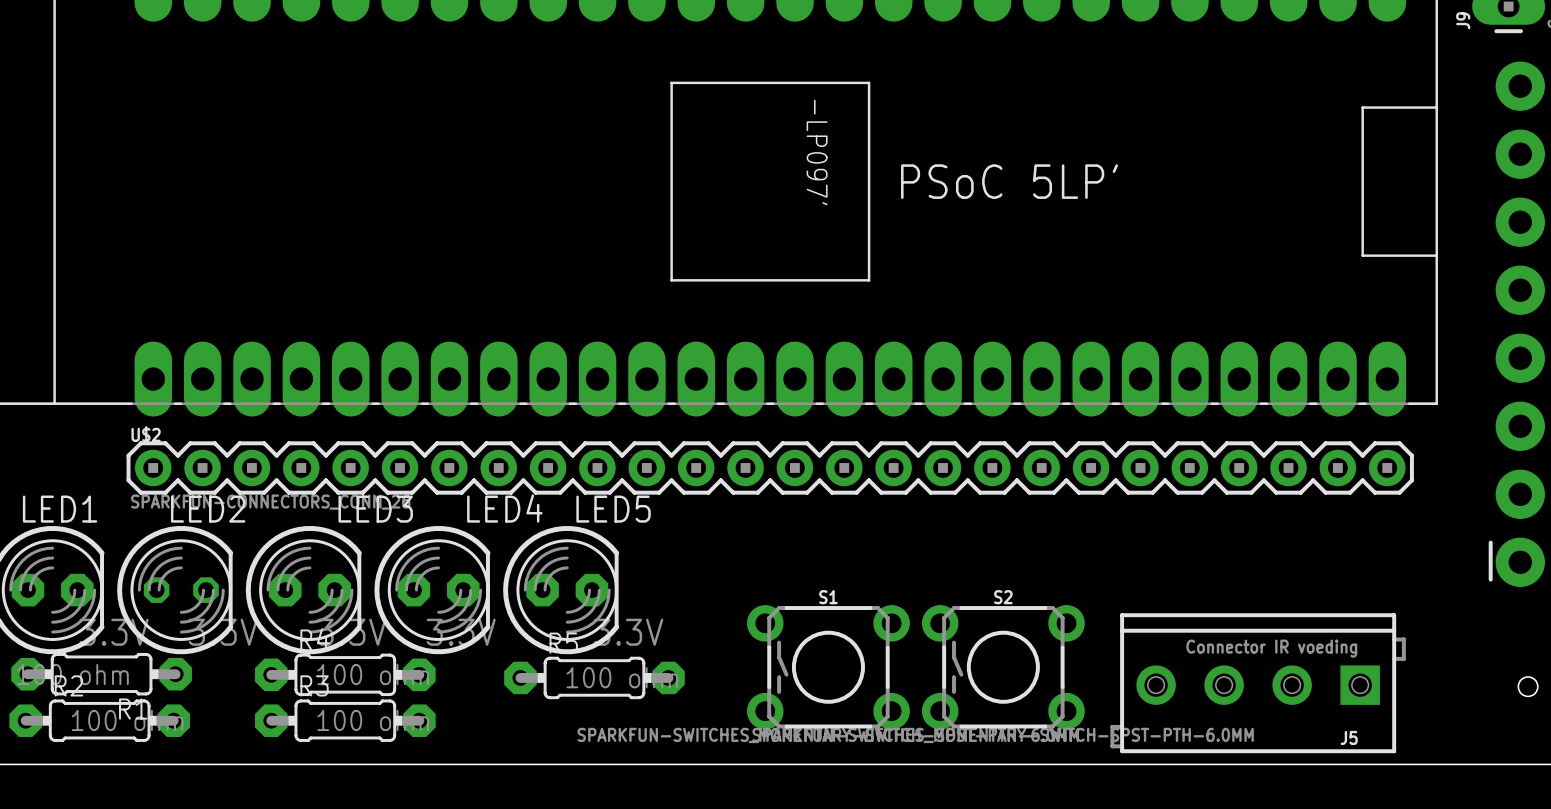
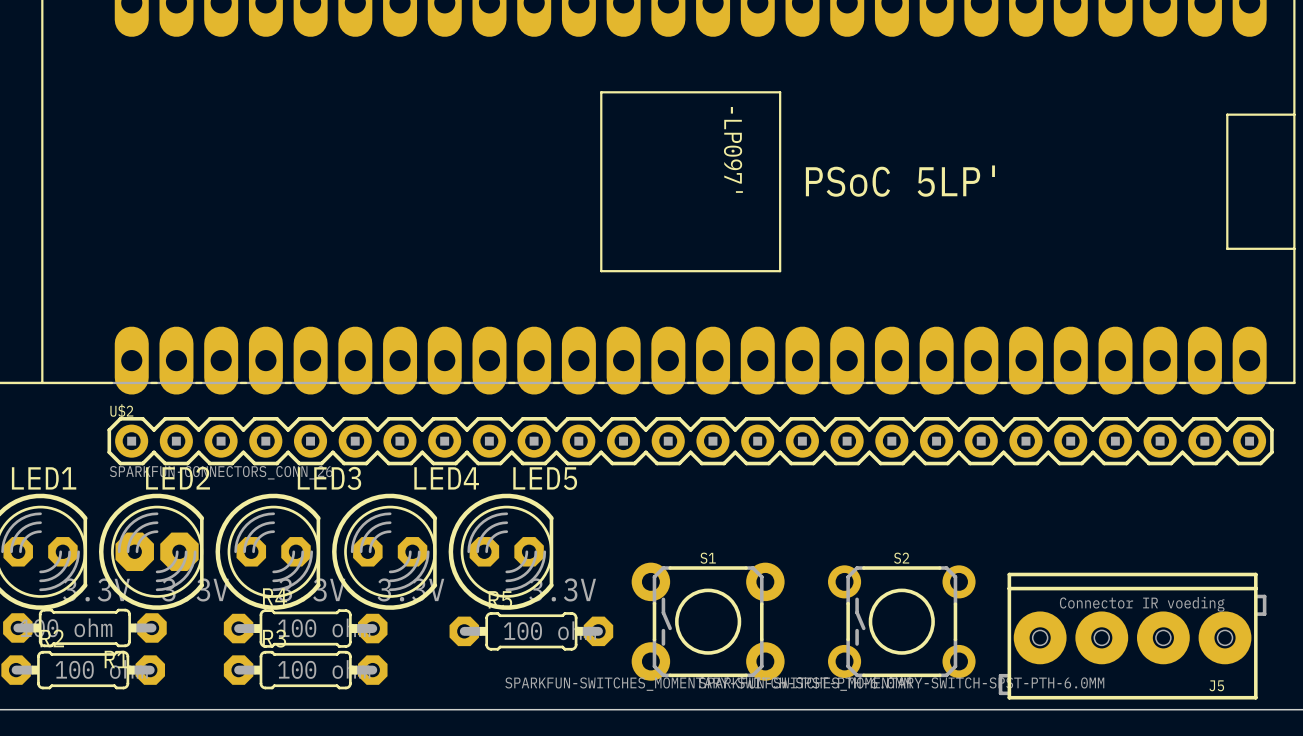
LED2 footprint: [117, 526, 234, 655] -> [98, 493, 205, 610]
S1 footprint: [747, 605, 910, 730] -> [631, 562, 785, 681]
J5 footprint: [1110, 613, 1406, 754] -> [998, 572, 1267, 700]

